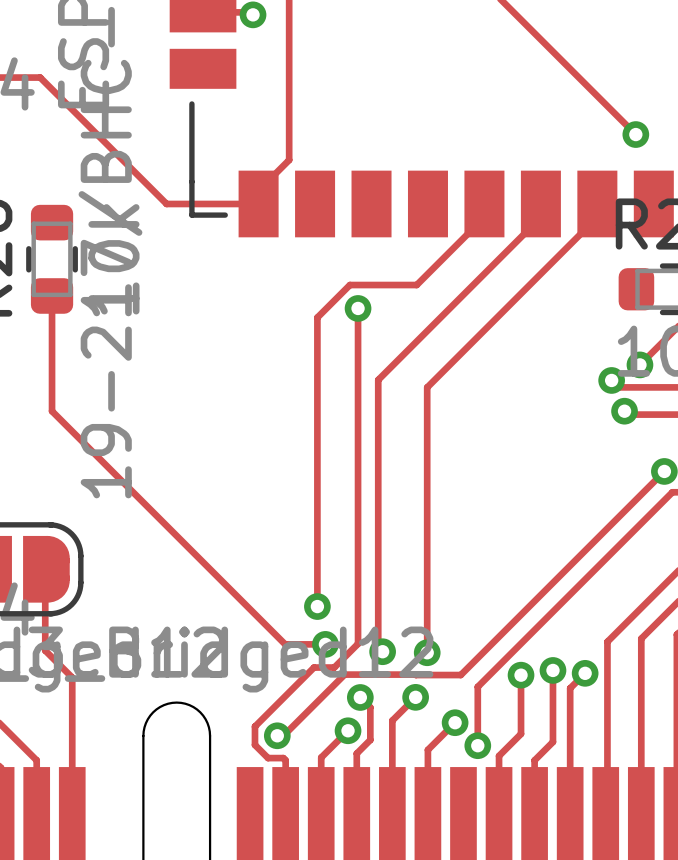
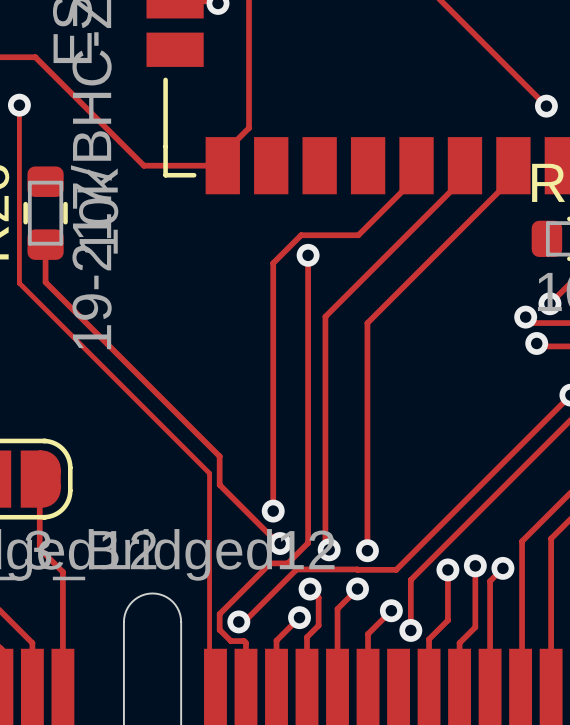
track: none -> (19, 105) (19, 283) (209, 473) (209, 687) (215, 693)
via: none -> (19, 105)
track: (52, 339) (52, 411) (285, 644) (323, 644) -> (45, 282) (219, 456) (219, 484) (278, 543)

